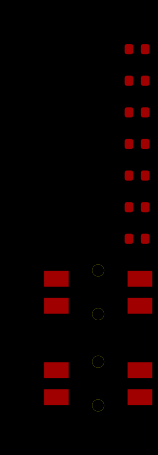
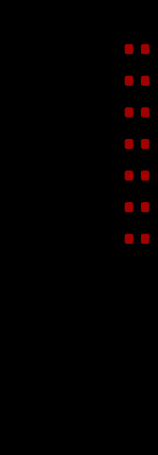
part: (98, 292) -> none
part: (98, 383) -> none

